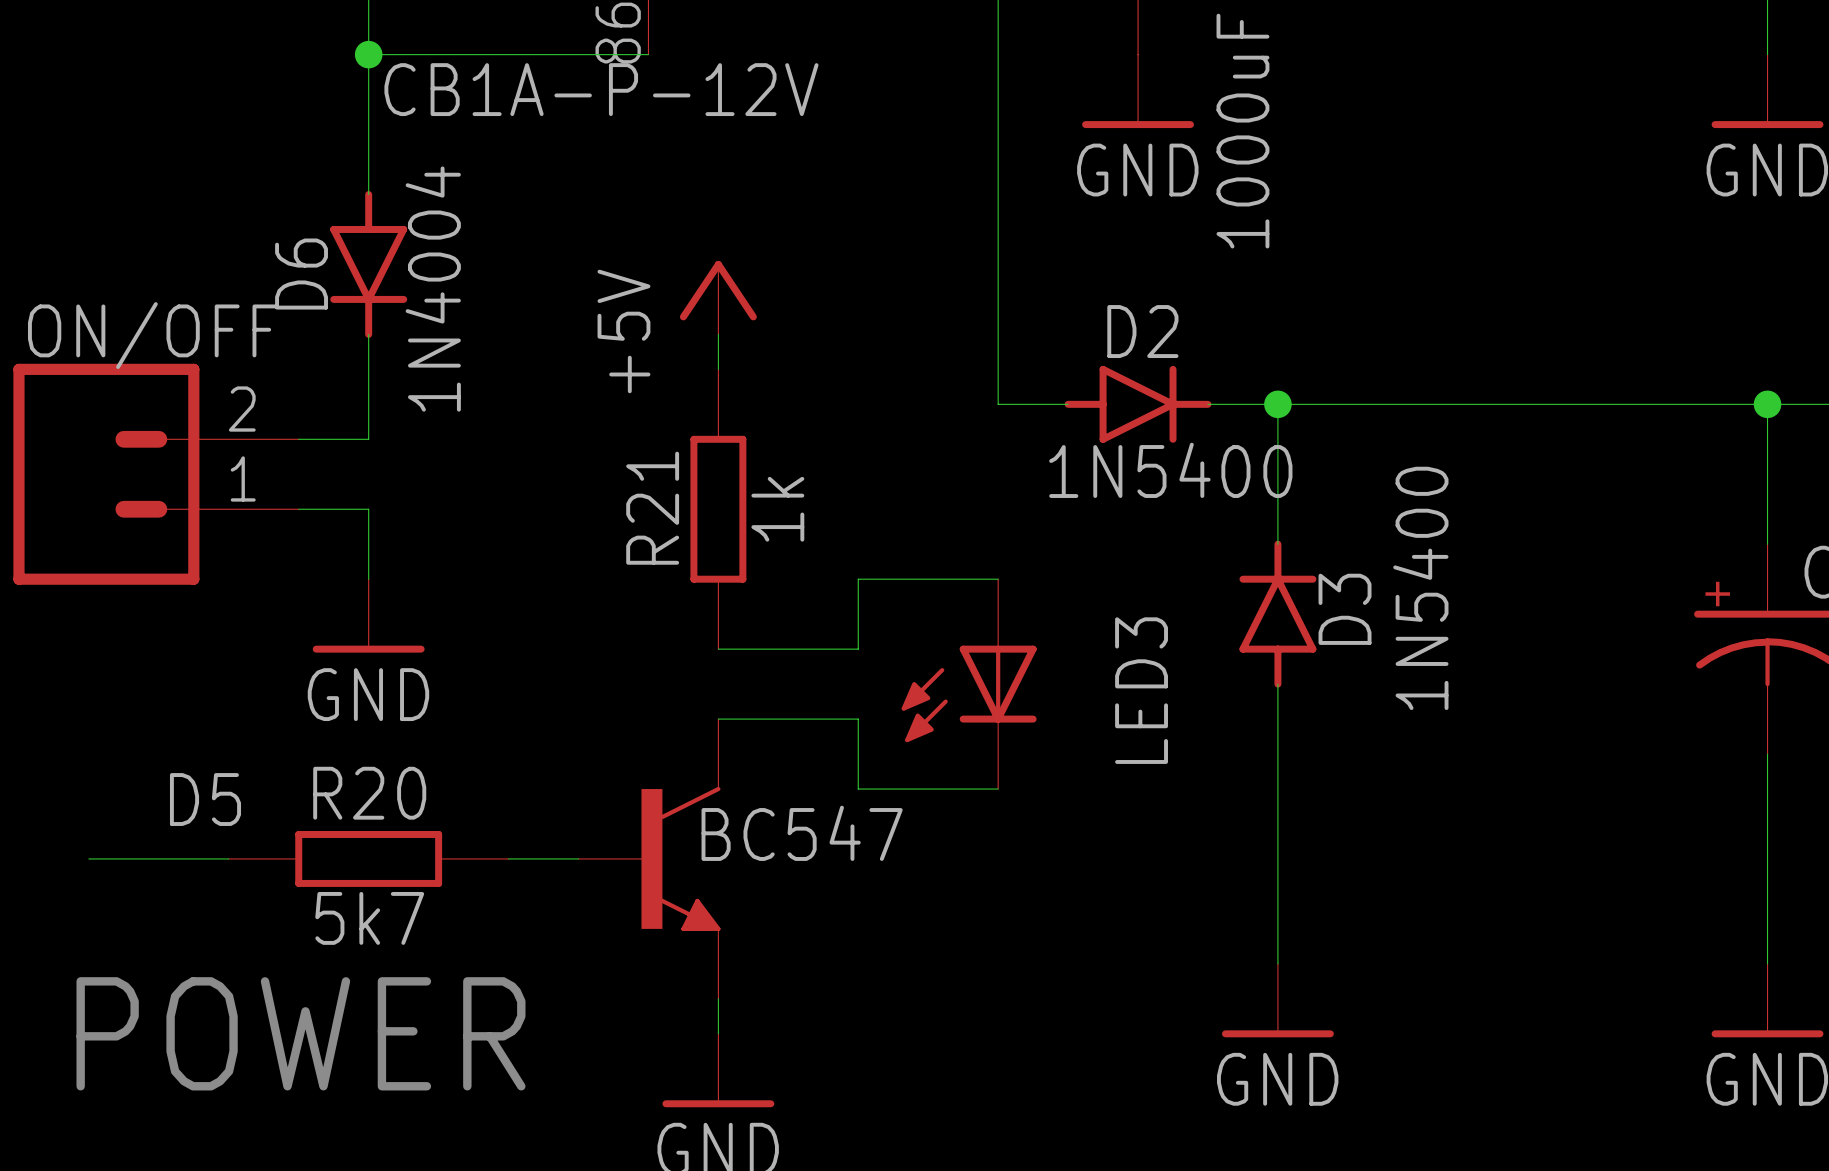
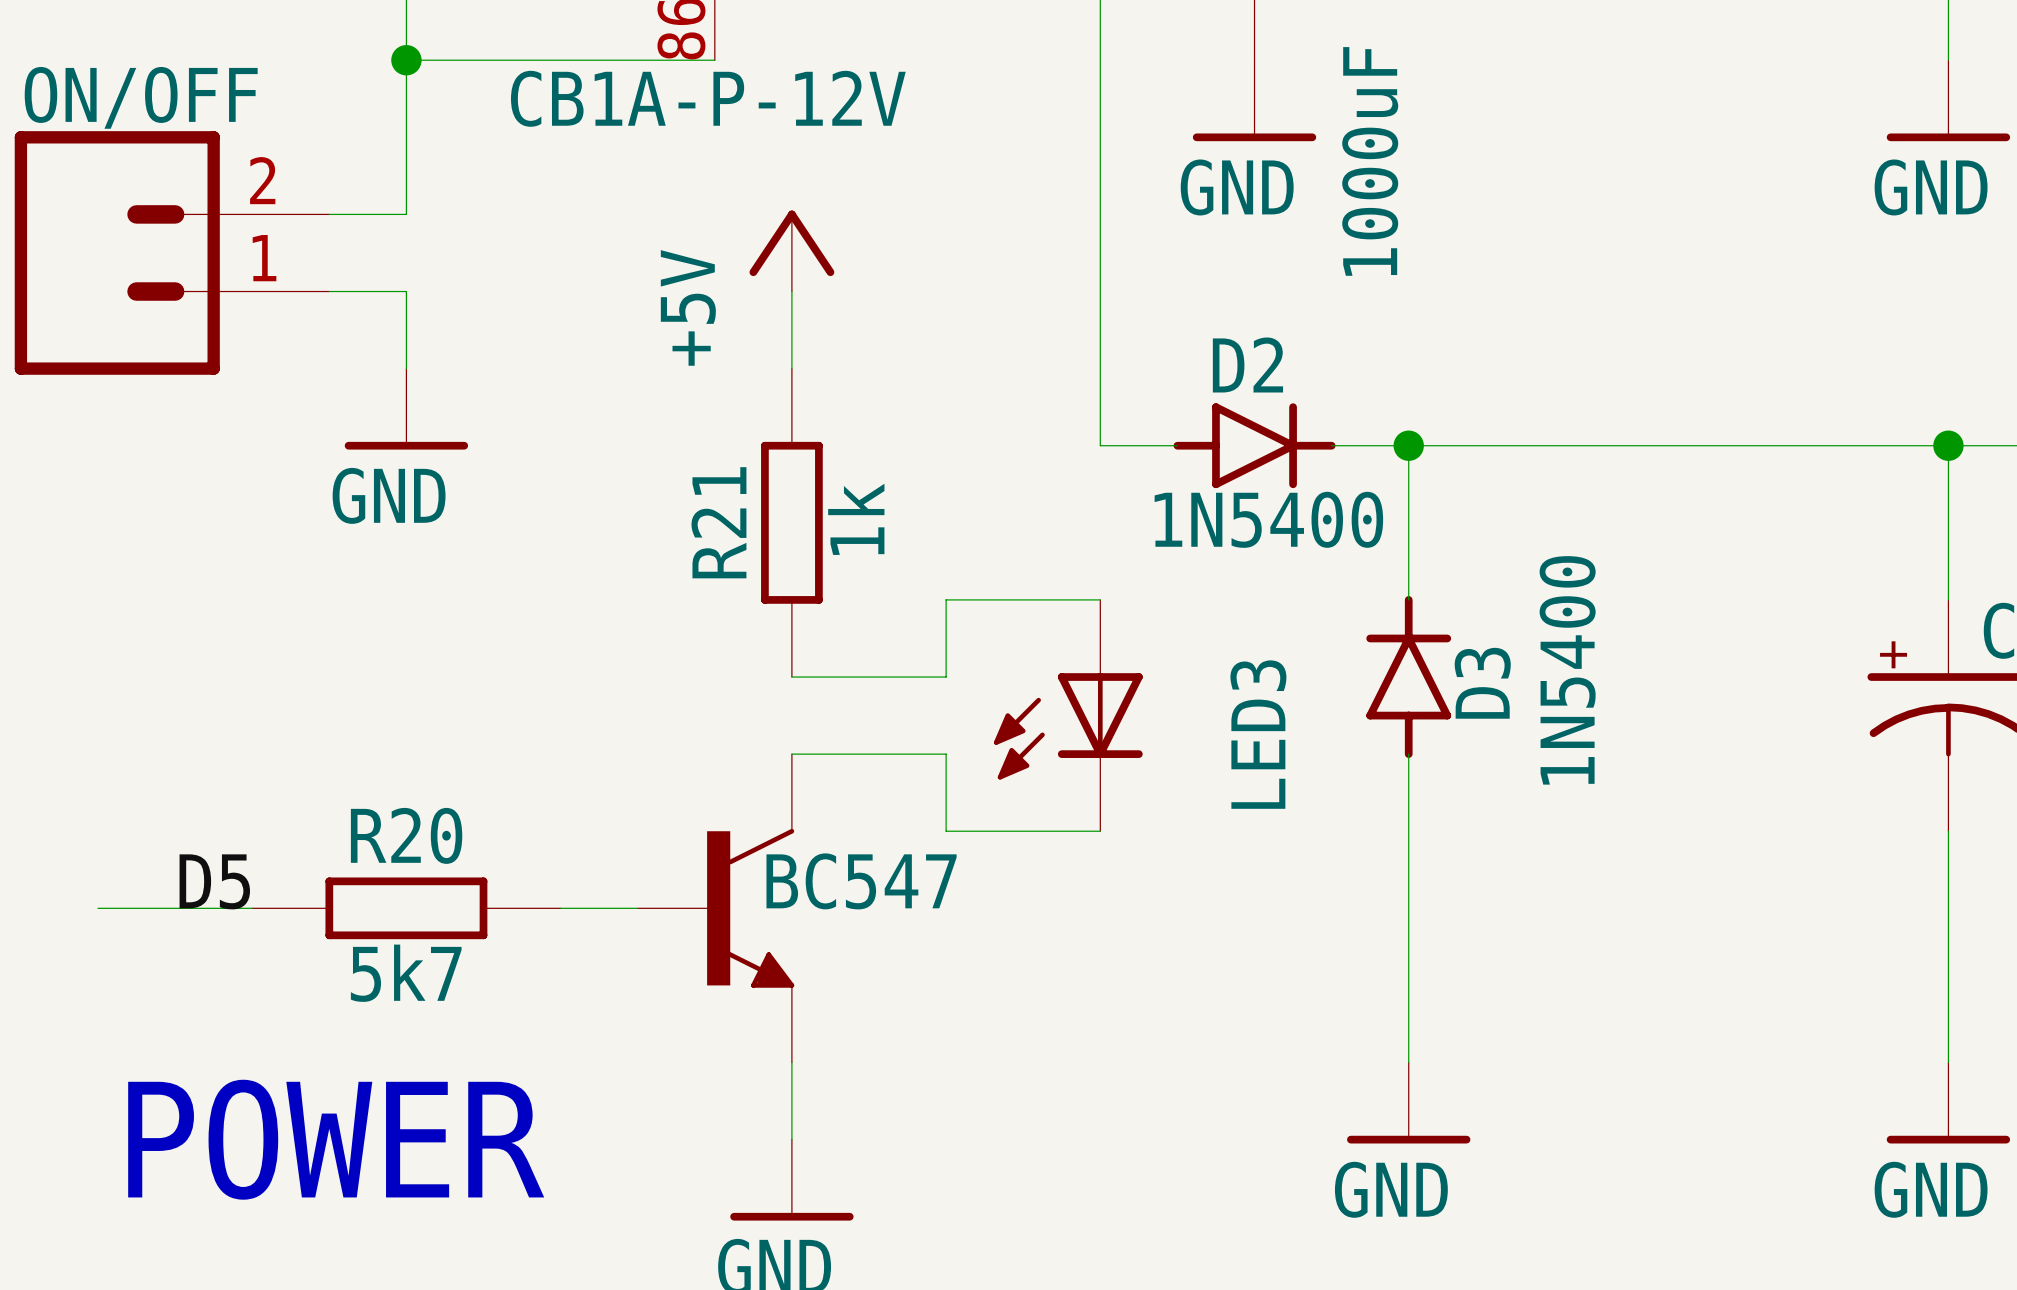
wire: none -> (329, 214) (406, 214)
D6: 1N4004 (368, 264) -> none
power symbol position: +5V (718, 297) -> +5V (791, 251)
wire: (368, 334) (368, 439) (298, 439) -> (406, 368) (406, 291) (329, 291)
ON/OFF position: (156, 474) -> (172, 252)
wire: (298, 509) (368, 509) (368, 579) -> none
R21 position: (718, 509) -> (791, 522)
wire: (858, 579) (998, 579) -> (946, 638) (946, 599) (1100, 599)
wire: (858, 614) (858, 649) (718, 649) -> (946, 677) (791, 677)
power symbol position: GND (368, 615) -> GND (406, 409)
LED3 position: (969, 684) -> (1068, 715)
wire: (718, 719) (858, 719) -> (791, 754) (946, 754) (946, 792)
wire: (858, 754) (858, 789) (998, 789) -> (946, 831) (1100, 831)
wire: (88, 858) (228, 858) -> (98, 908) (252, 908)
R20 position: (368, 858) -> (406, 908)
wire: (508, 858) (578, 858) -> (560, 908) (637, 908)
part position: (649, 858) -> (715, 908)

